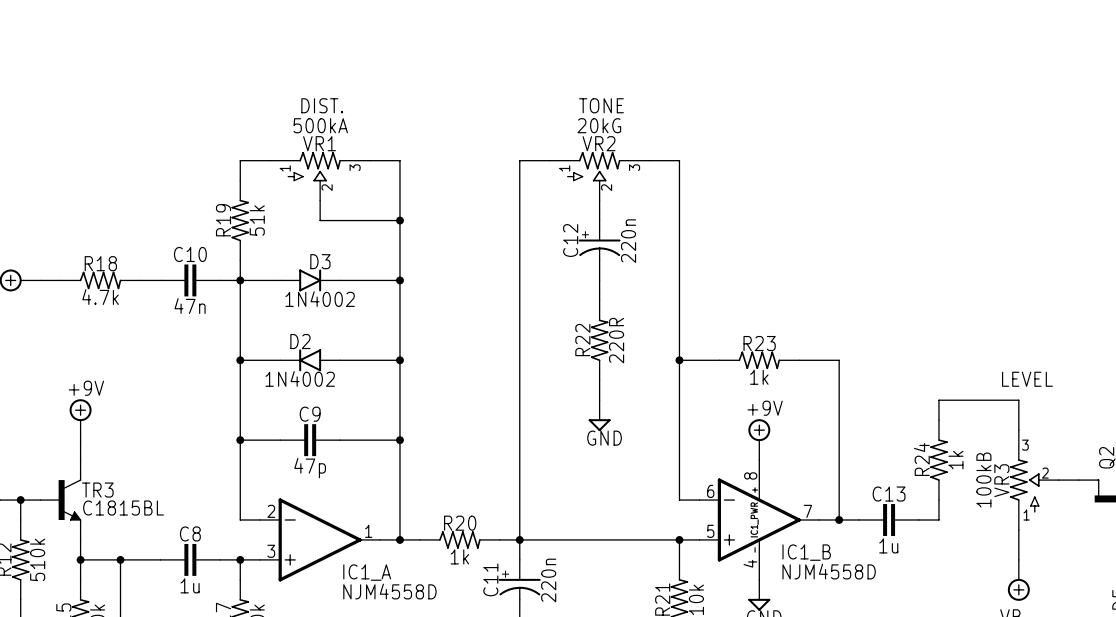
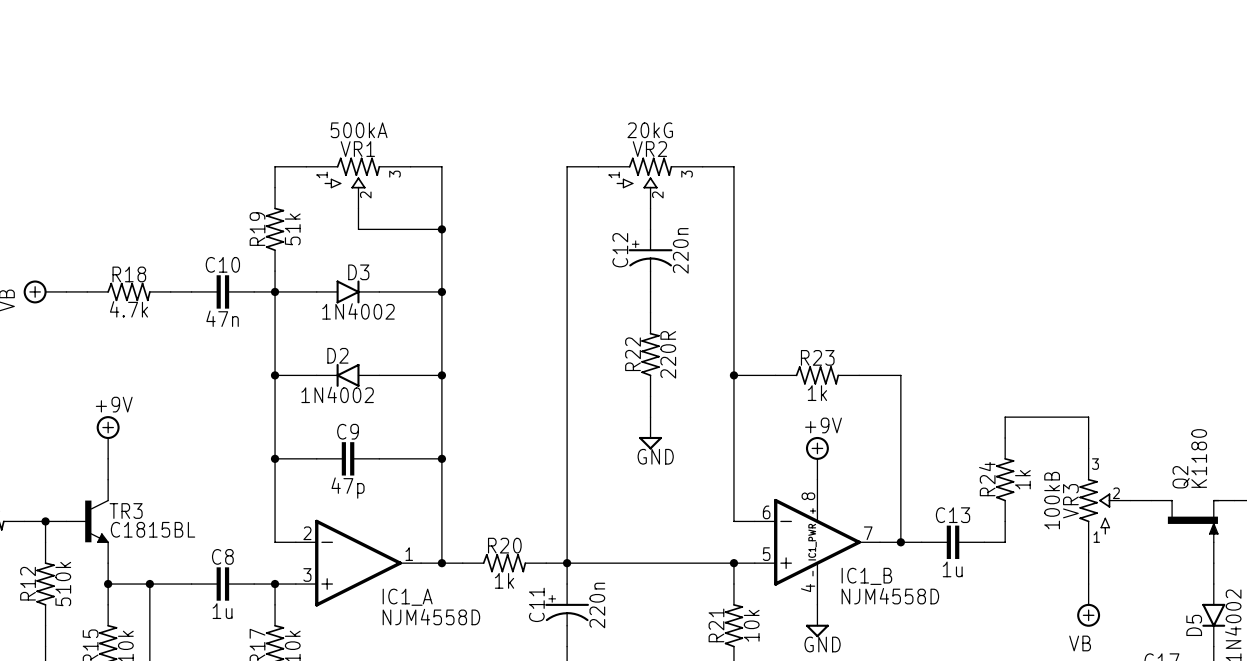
text: DIST. (322, 105) -> none
text: TONE (601, 105) -> none
text: LEVEL (1027, 379) -> none

